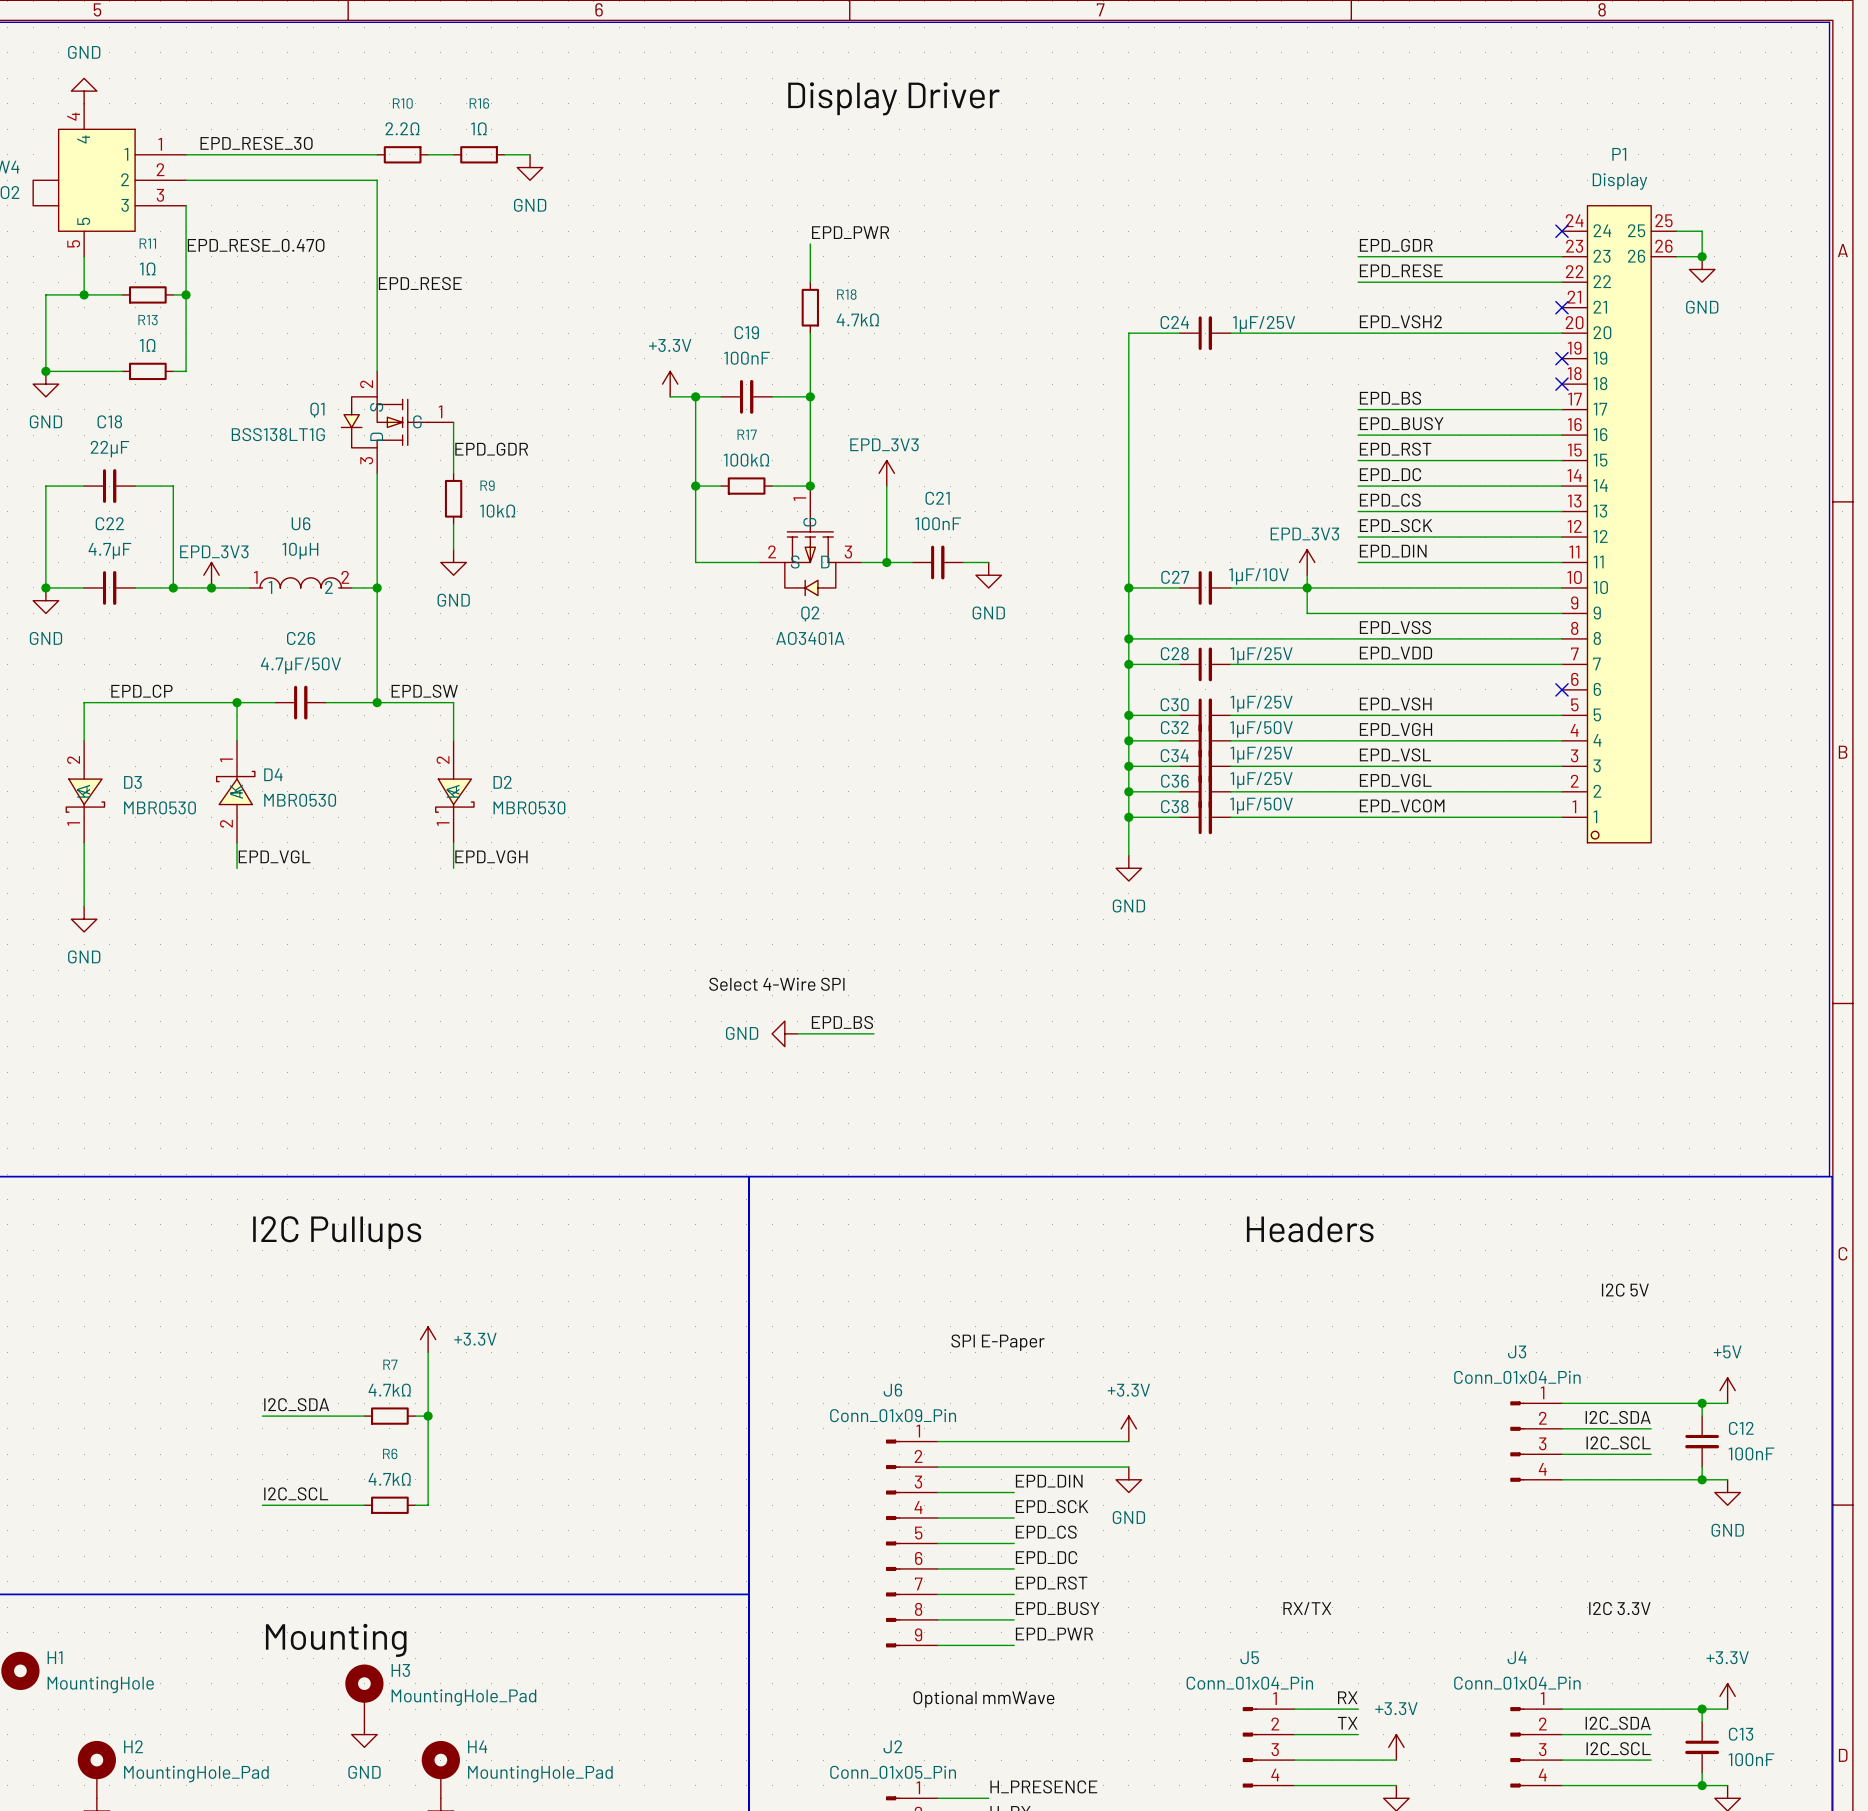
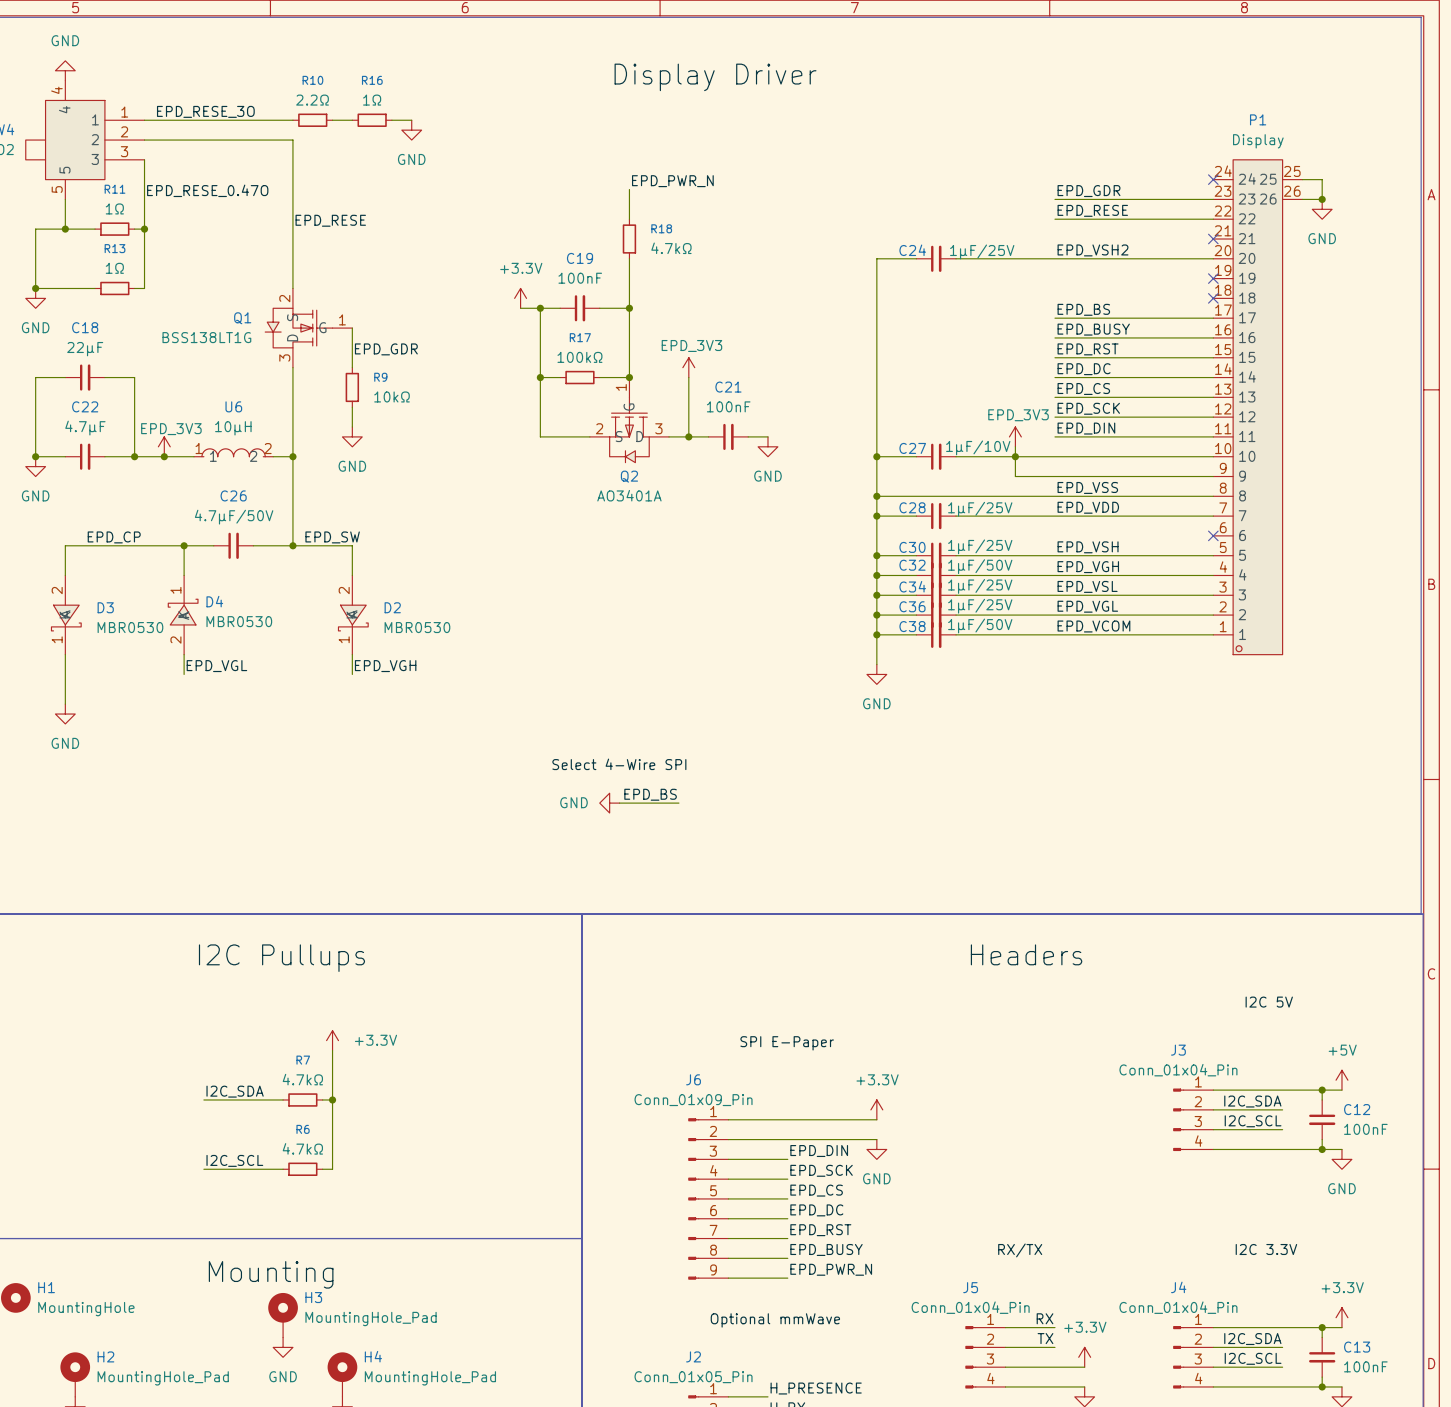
label: EPD_PWR (850, 232) -> EPD_PWR_N (672, 181)
label: EPD_PWR (1054, 1634) -> EPD_PWR_N (831, 1269)

